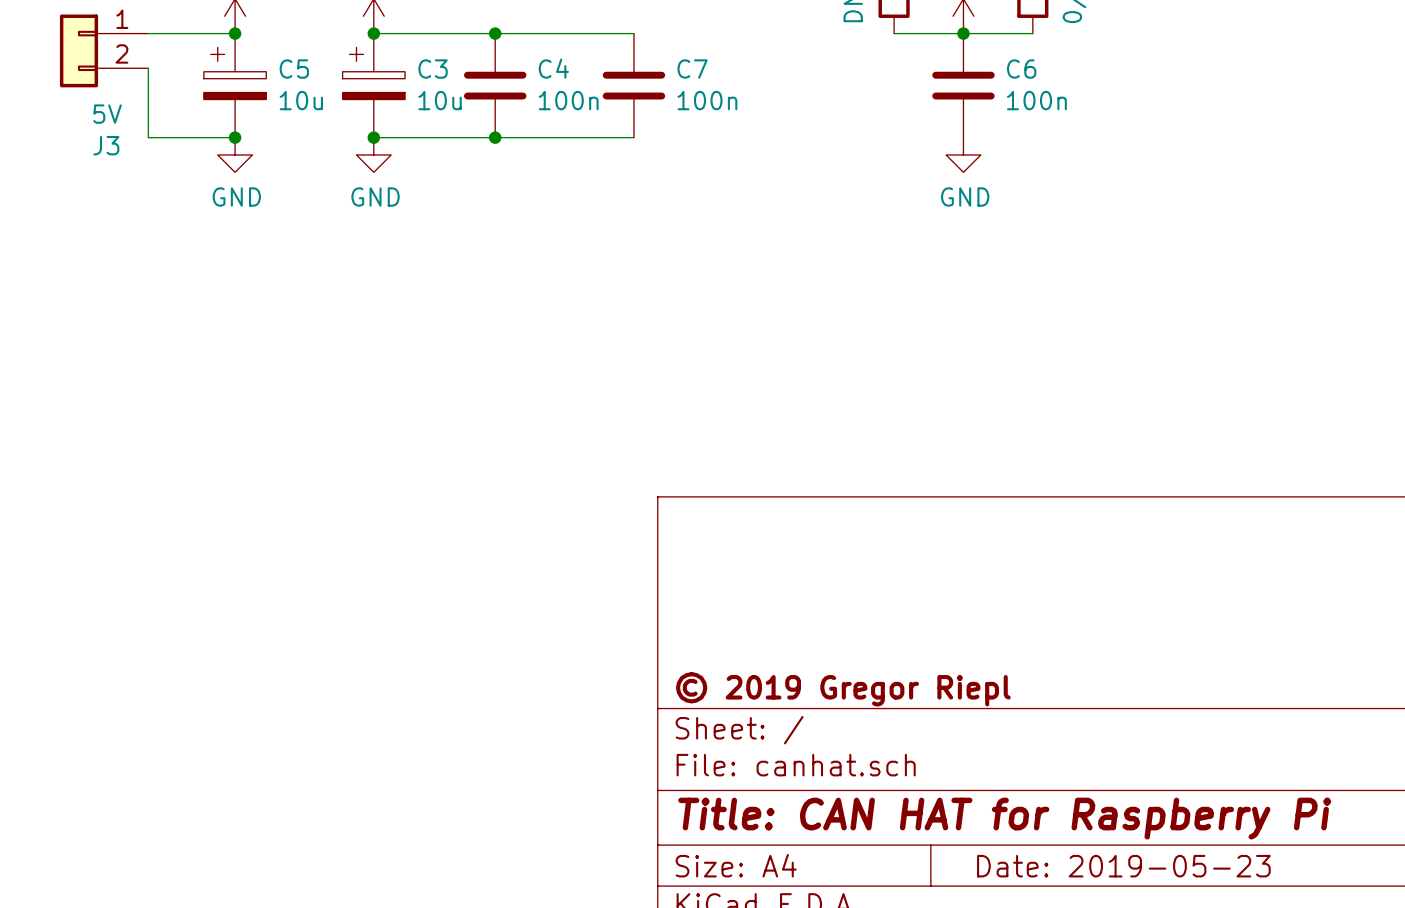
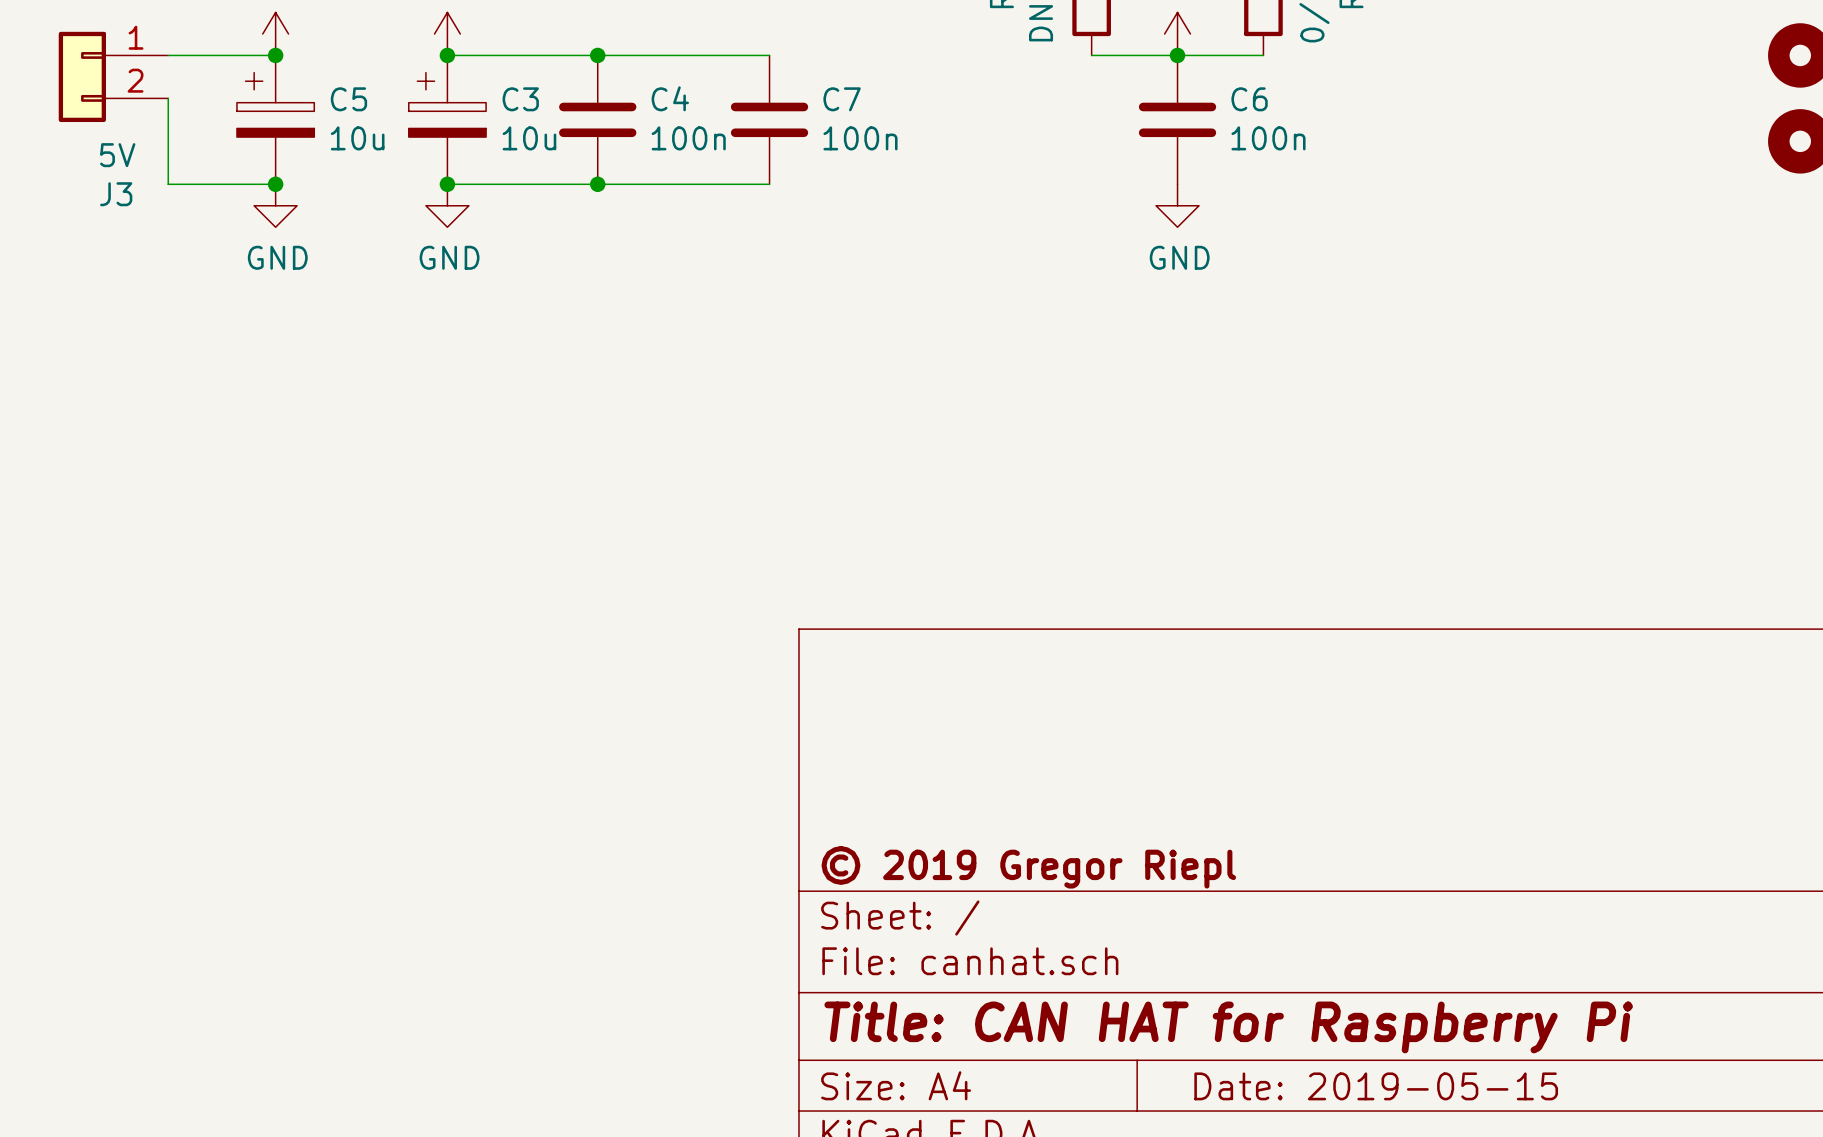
title block: Date: 2019-05-23 (1123, 866) -> Date: 2019-05-15 (1376, 1086)

